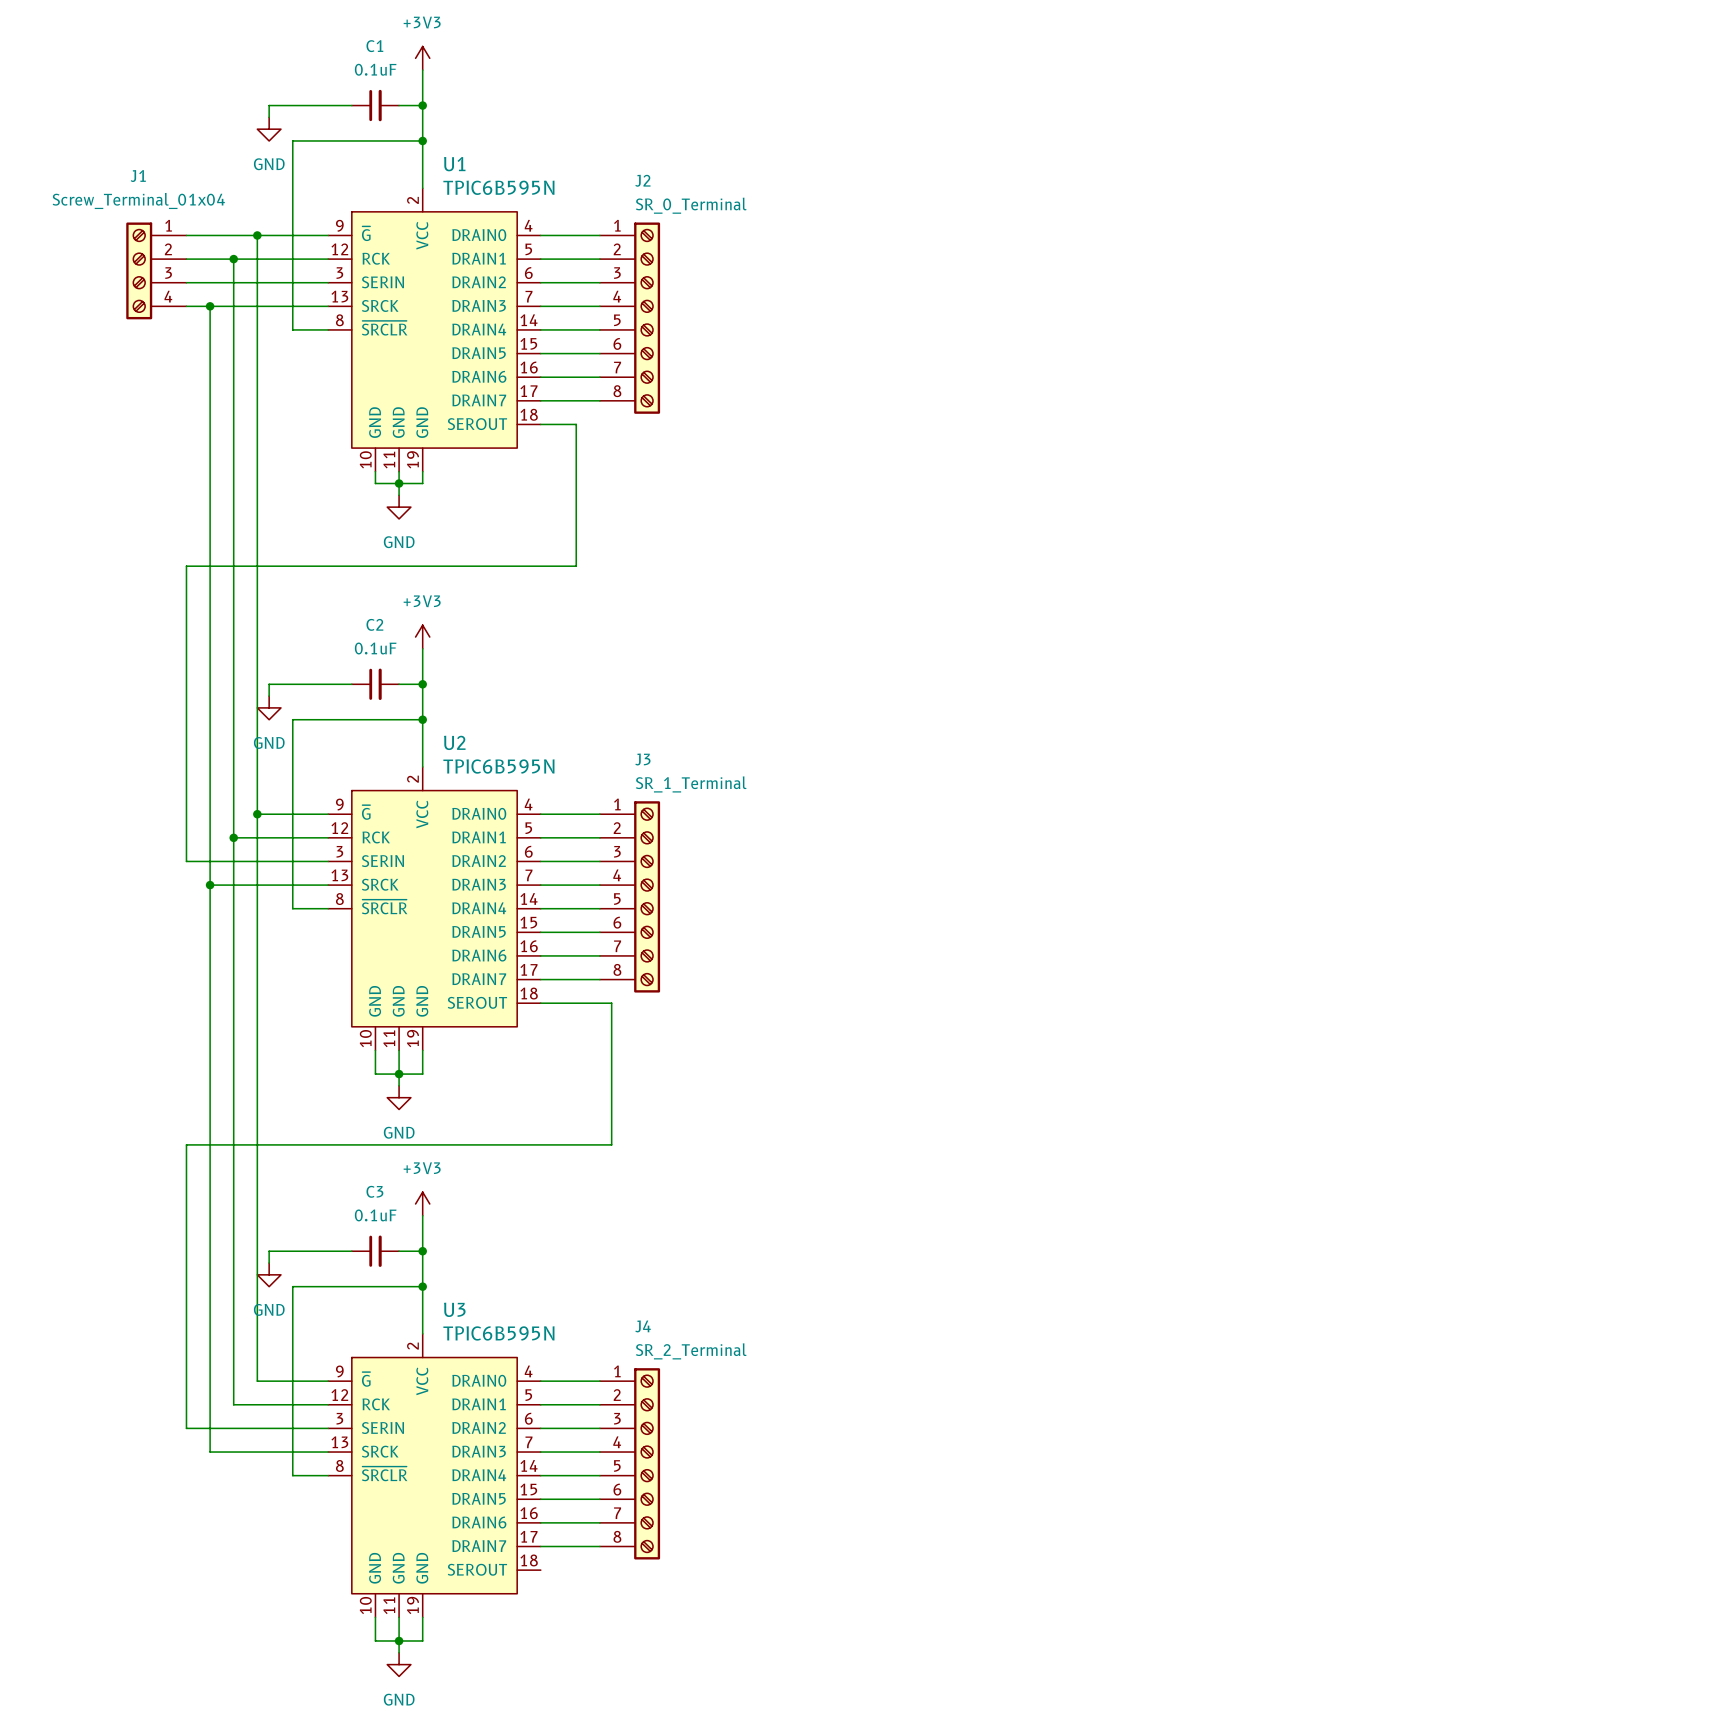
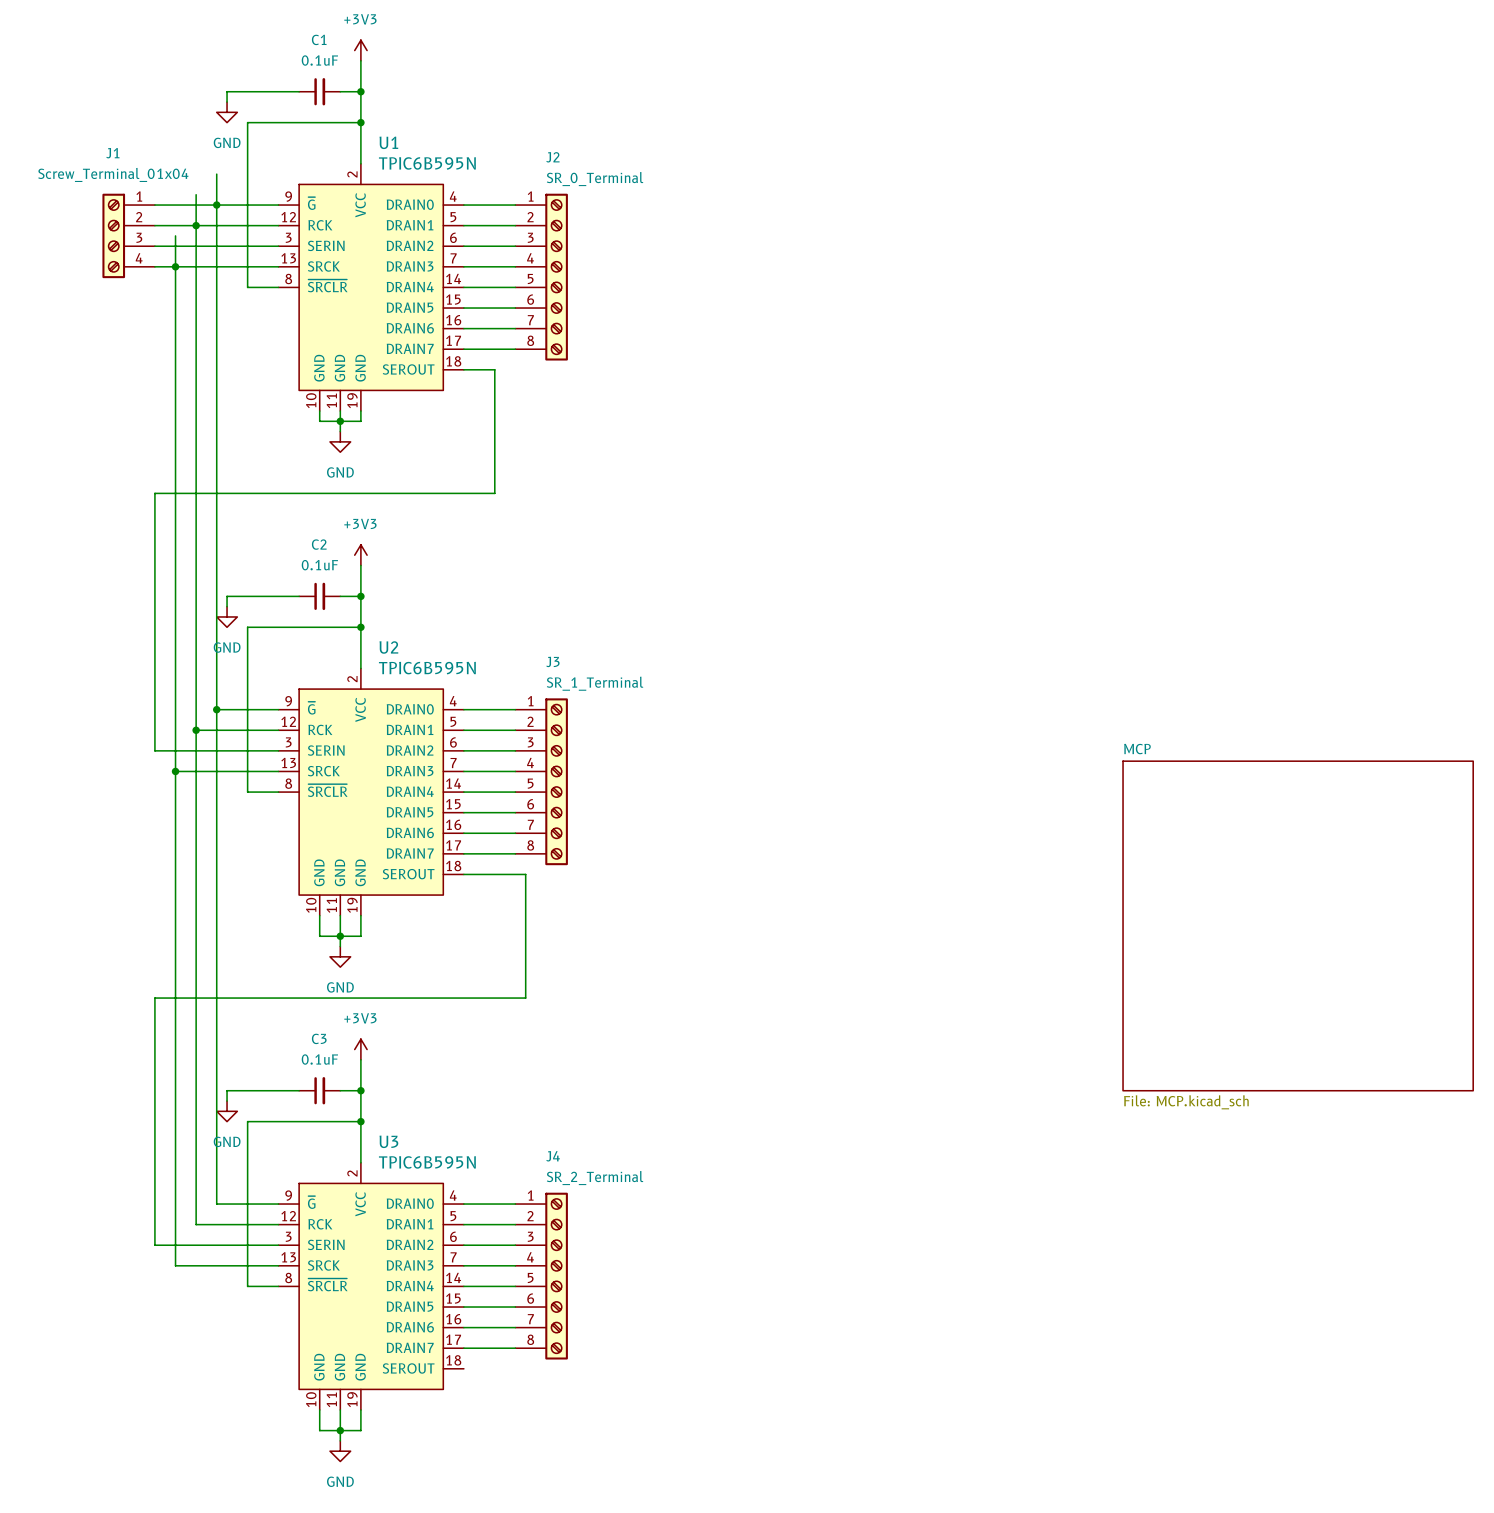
wire: none -> (216, 174) (216, 205)
wire: none -> (196, 194) (196, 225)
wire: none -> (175, 235) (175, 266)
sheet MCP: none -> File: MCP.kicad_sch (1298, 925)

